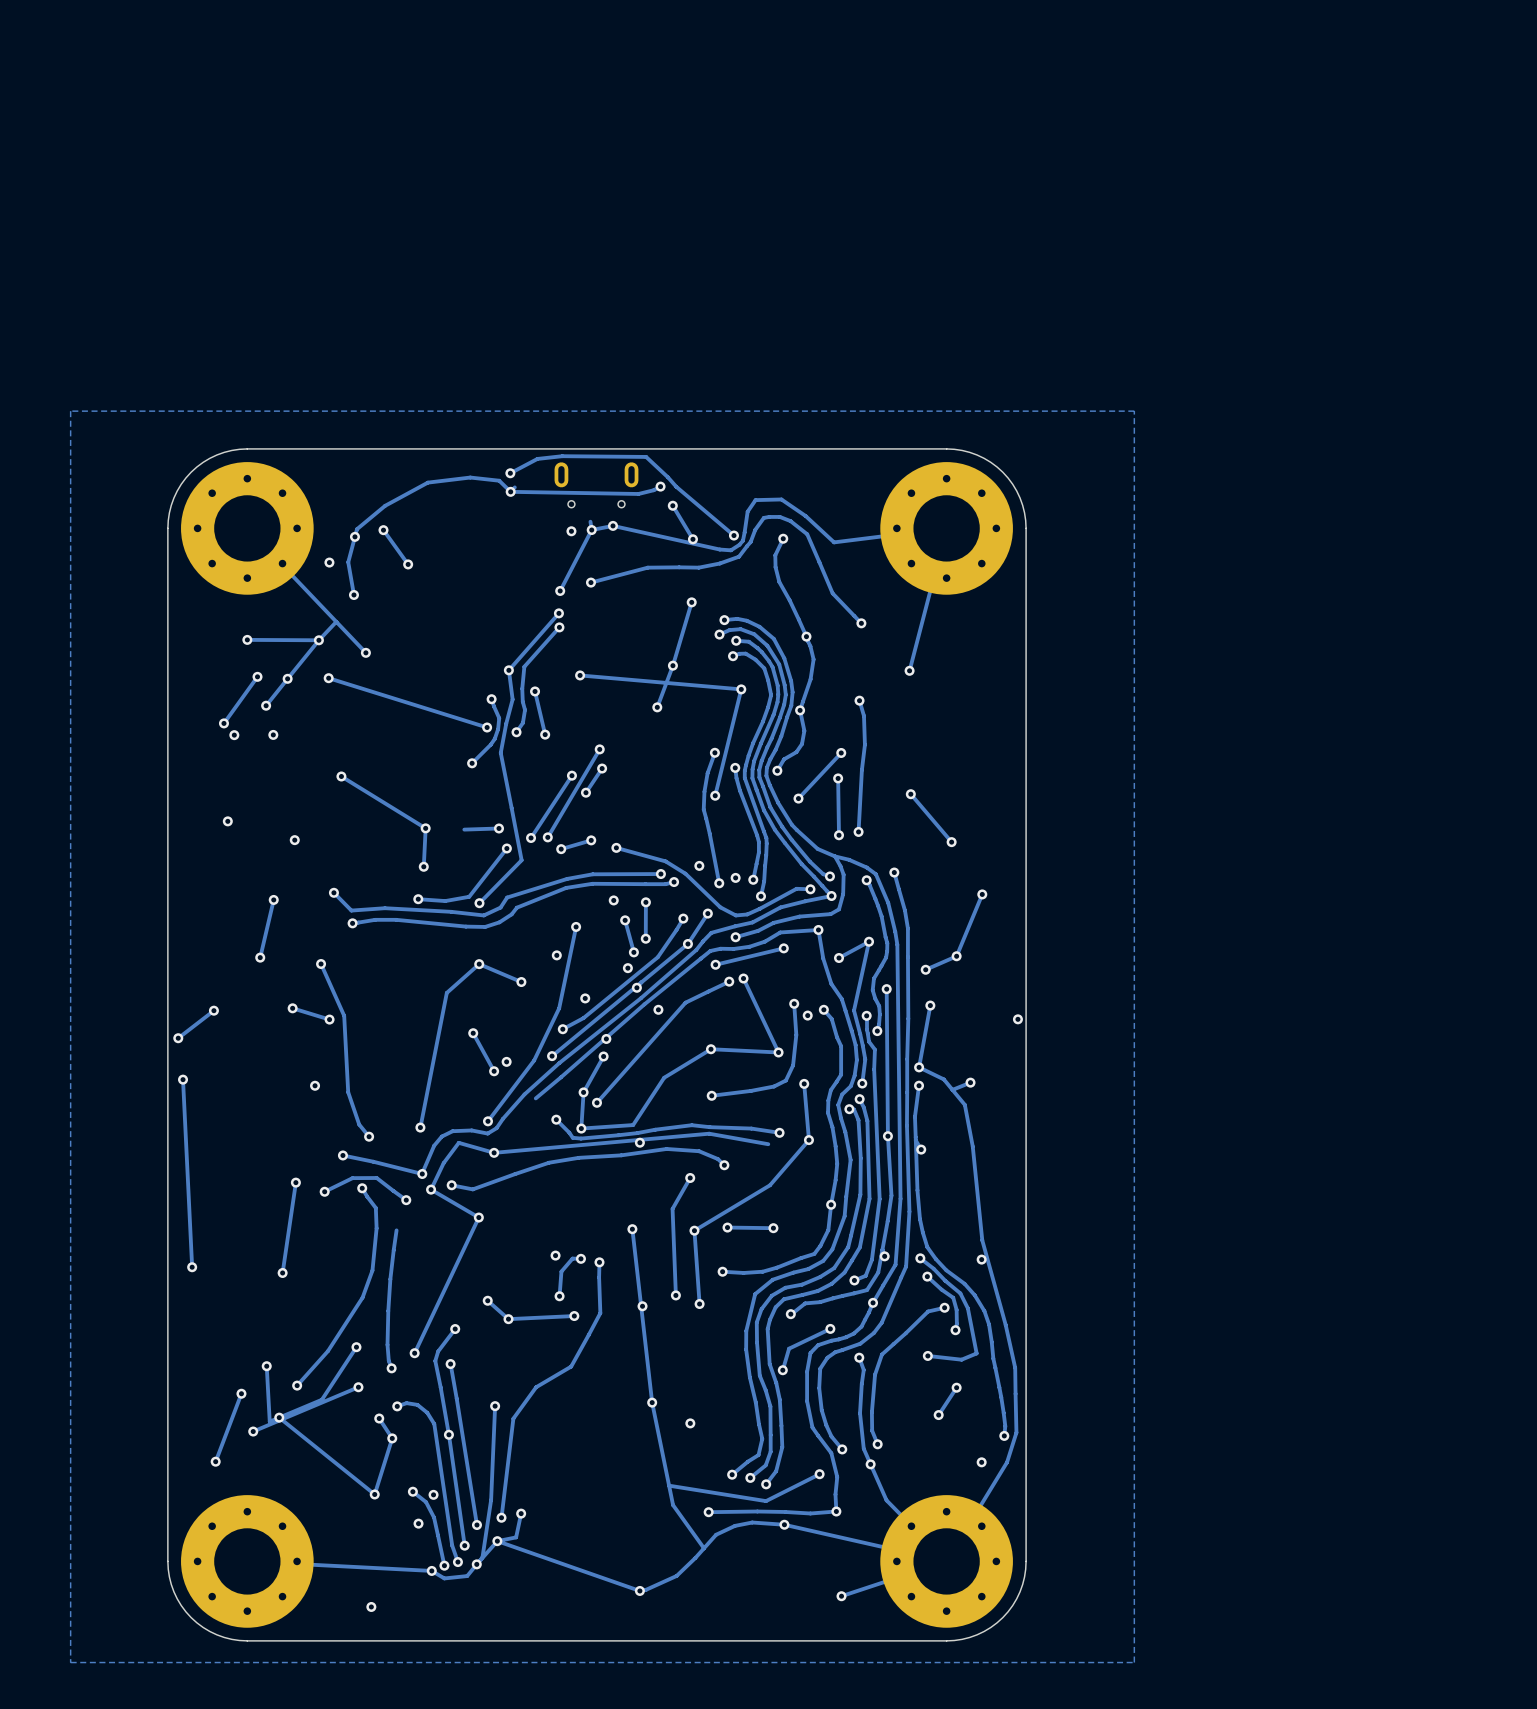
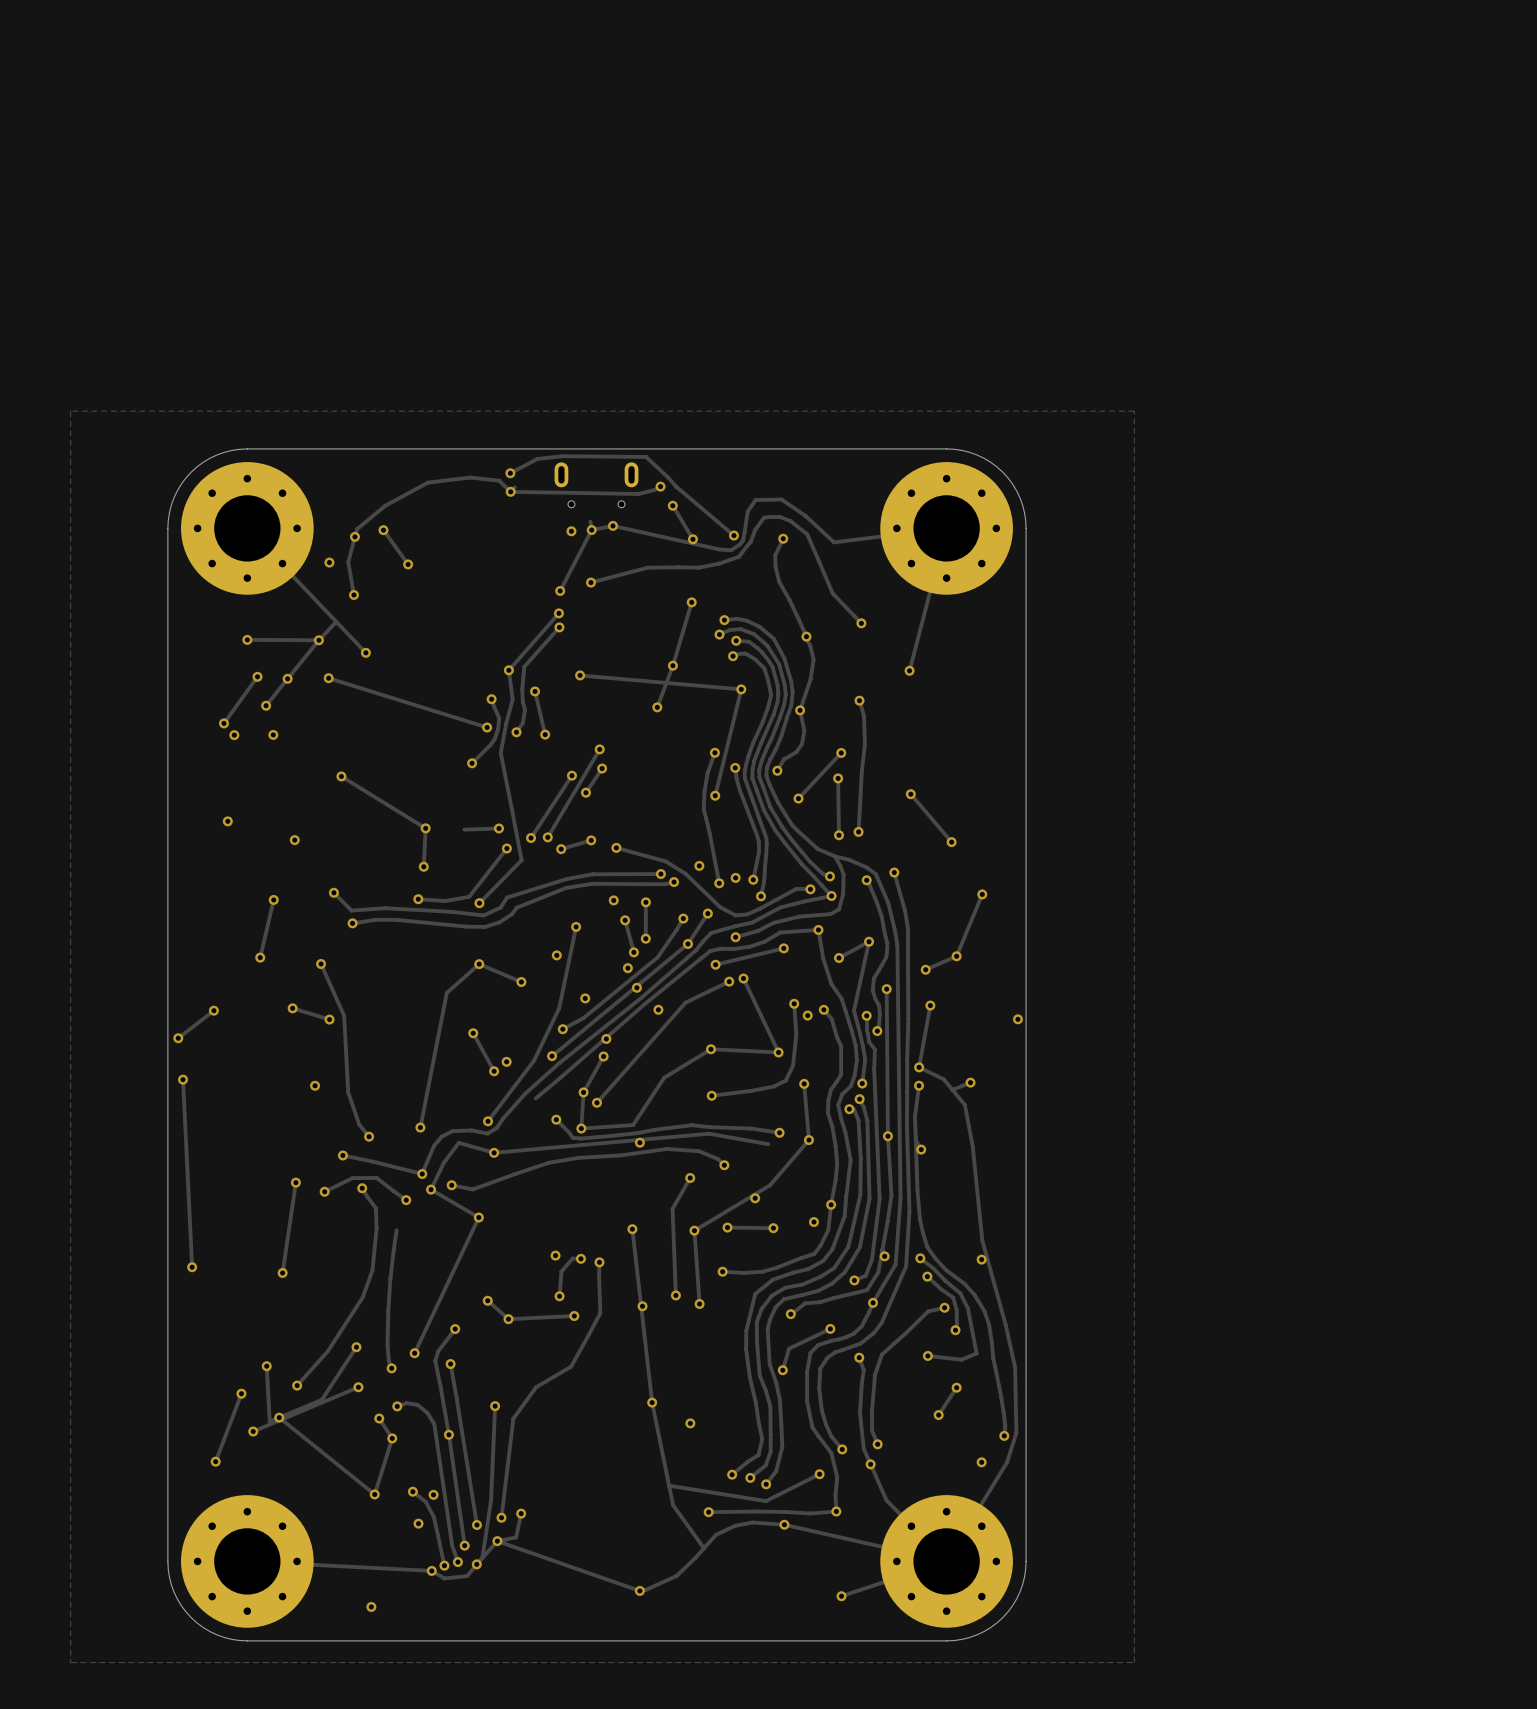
via: none -> (755, 1198)
via: none -> (813, 1222)

